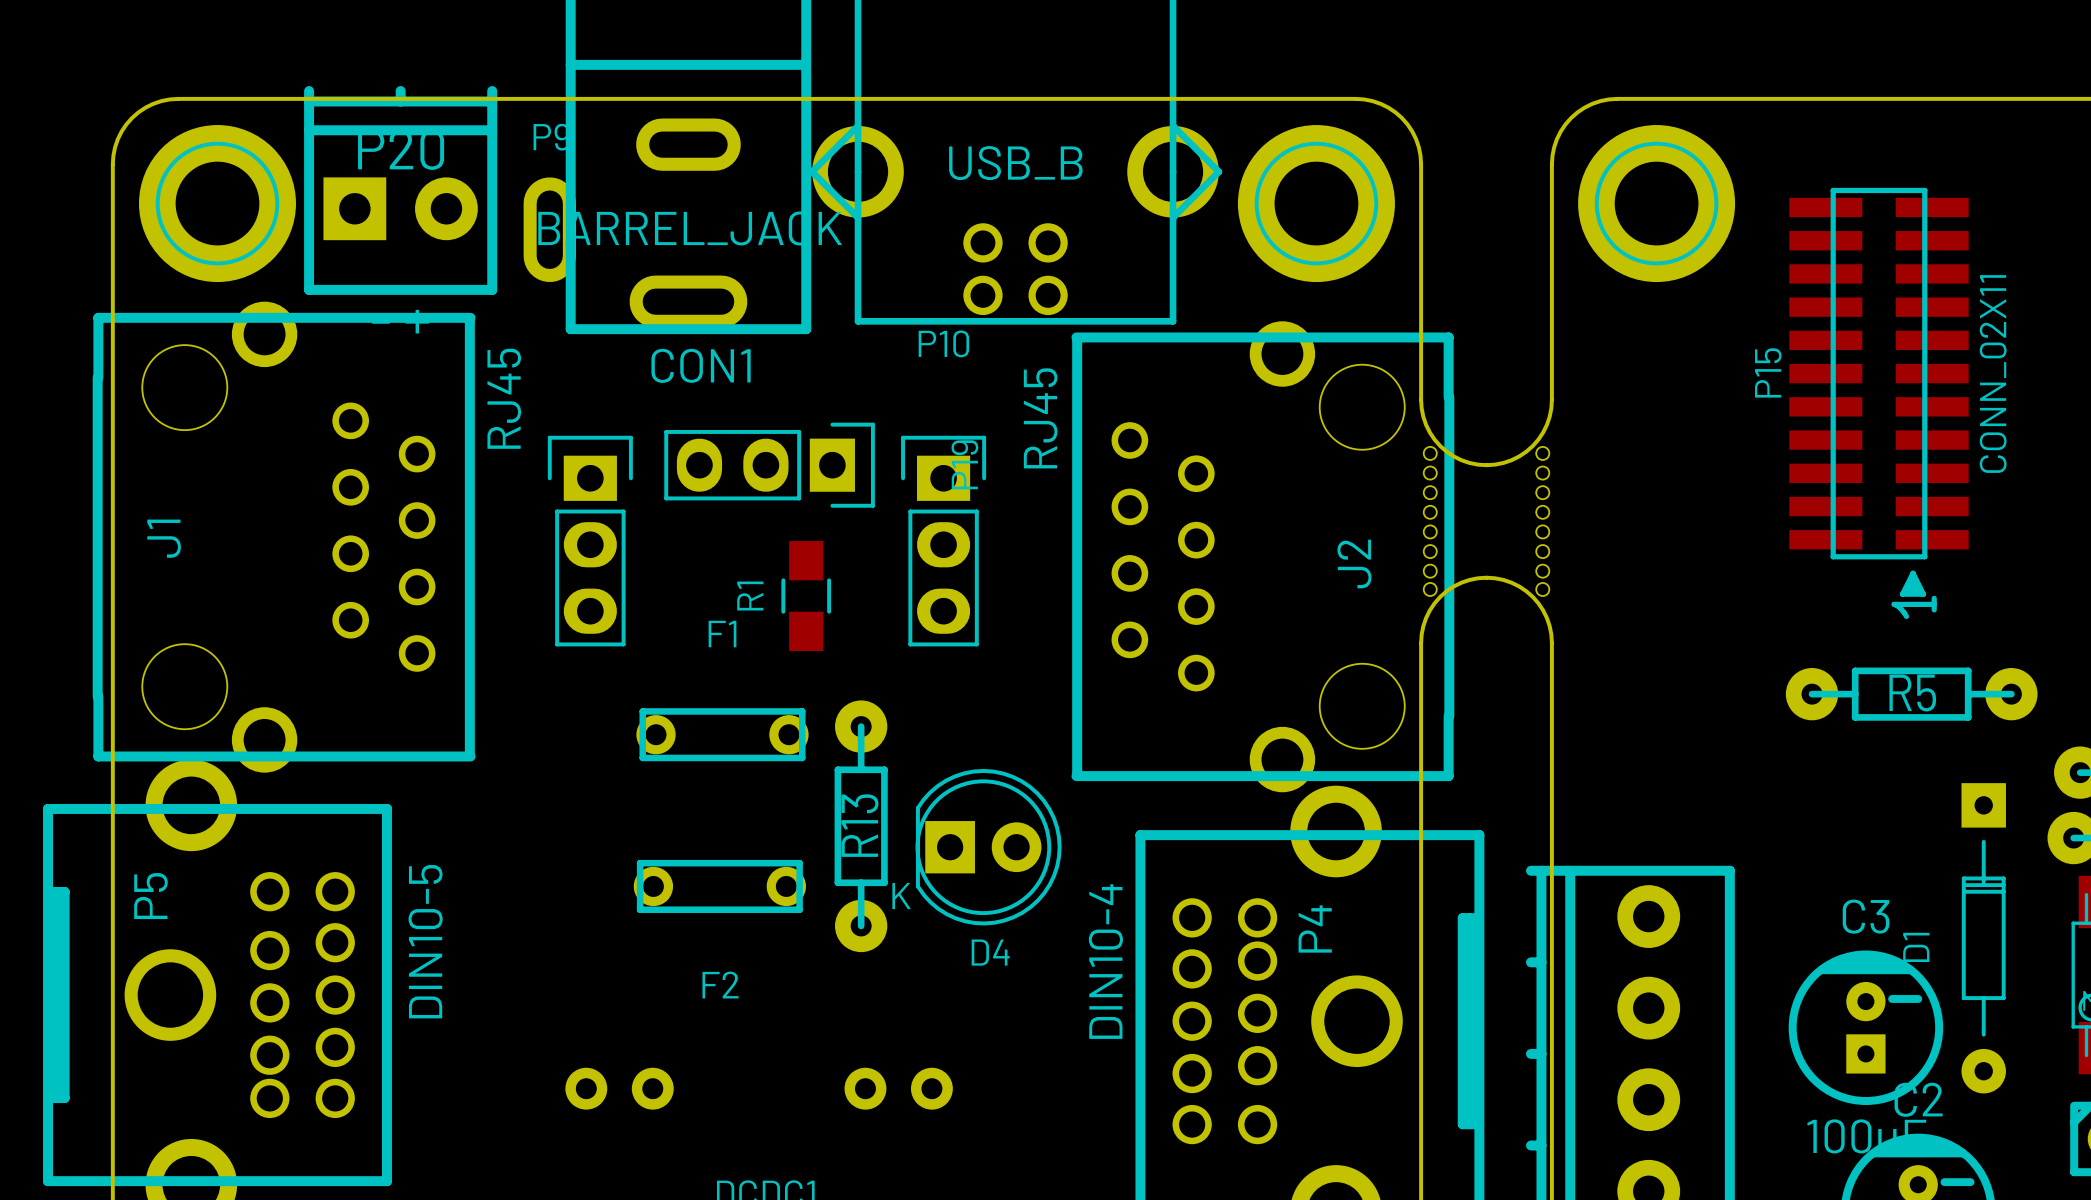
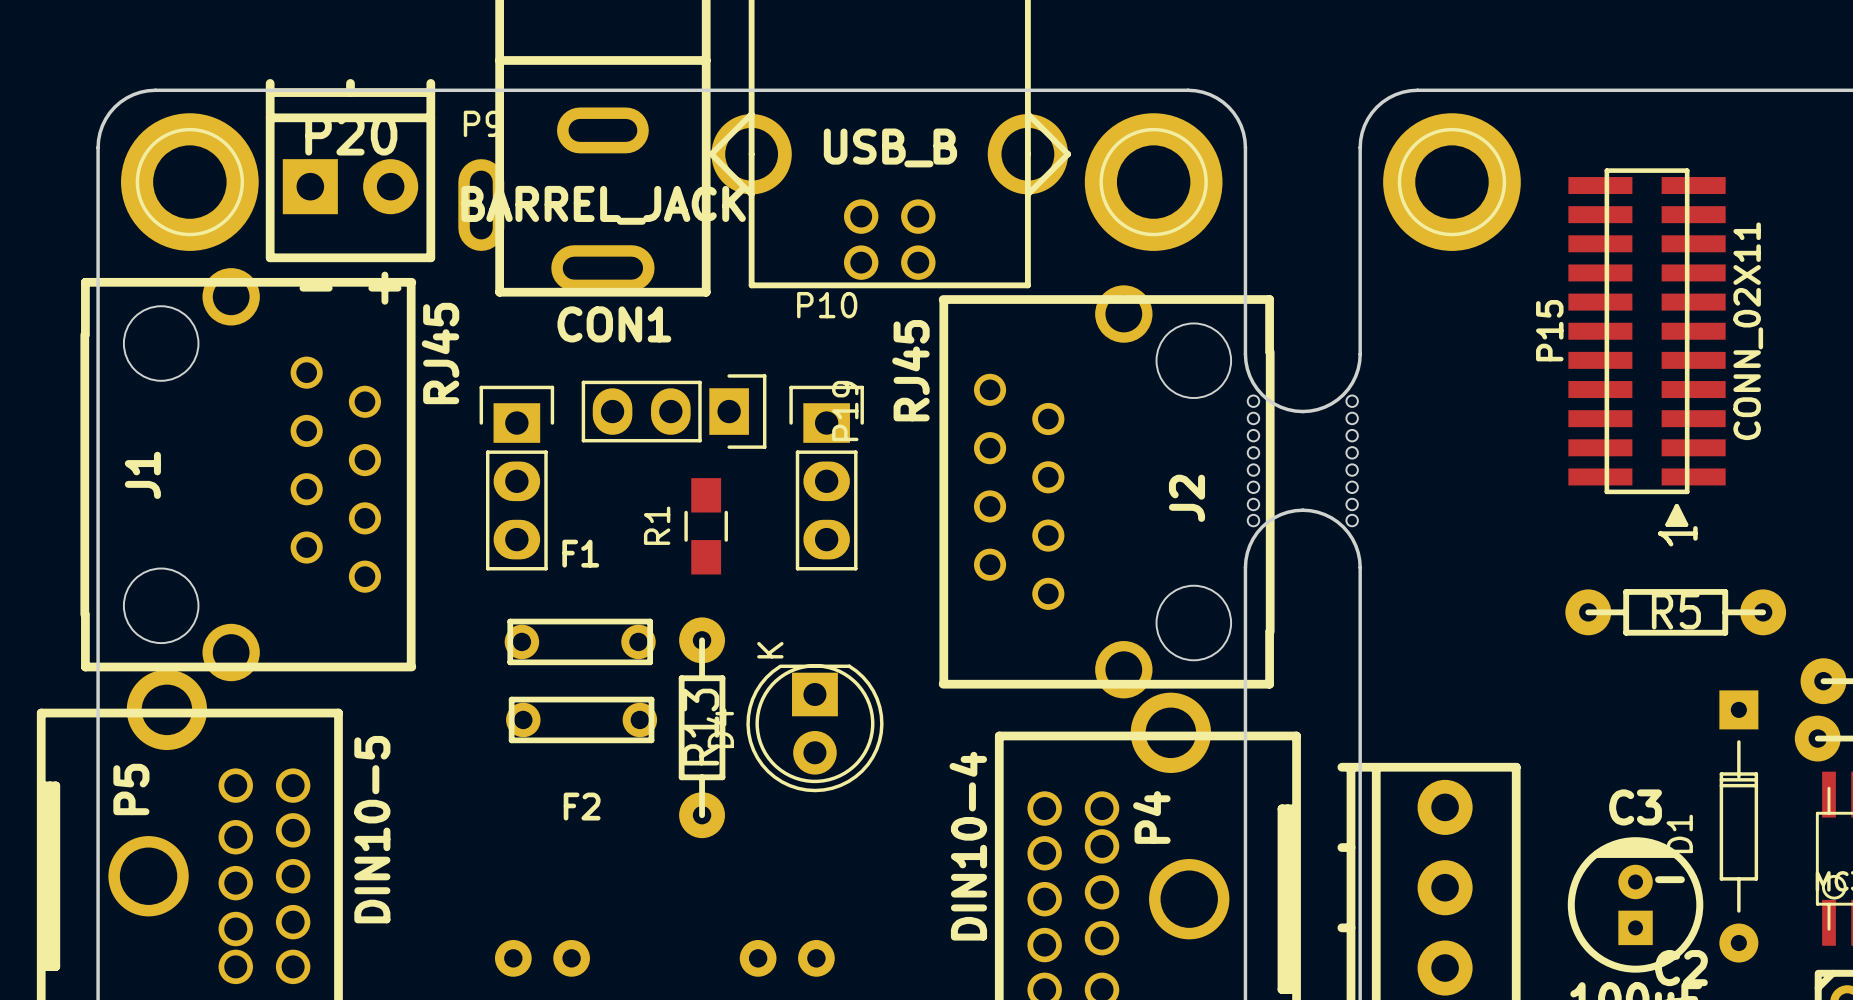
F1 position: (722, 734) -> (580, 641)
R13 position: (861, 826) -> (702, 727)
D4 rotation: 0° (988, 847) -> 90° clockwise (814, 728)
F2 position: (719, 886) -> (581, 719)

